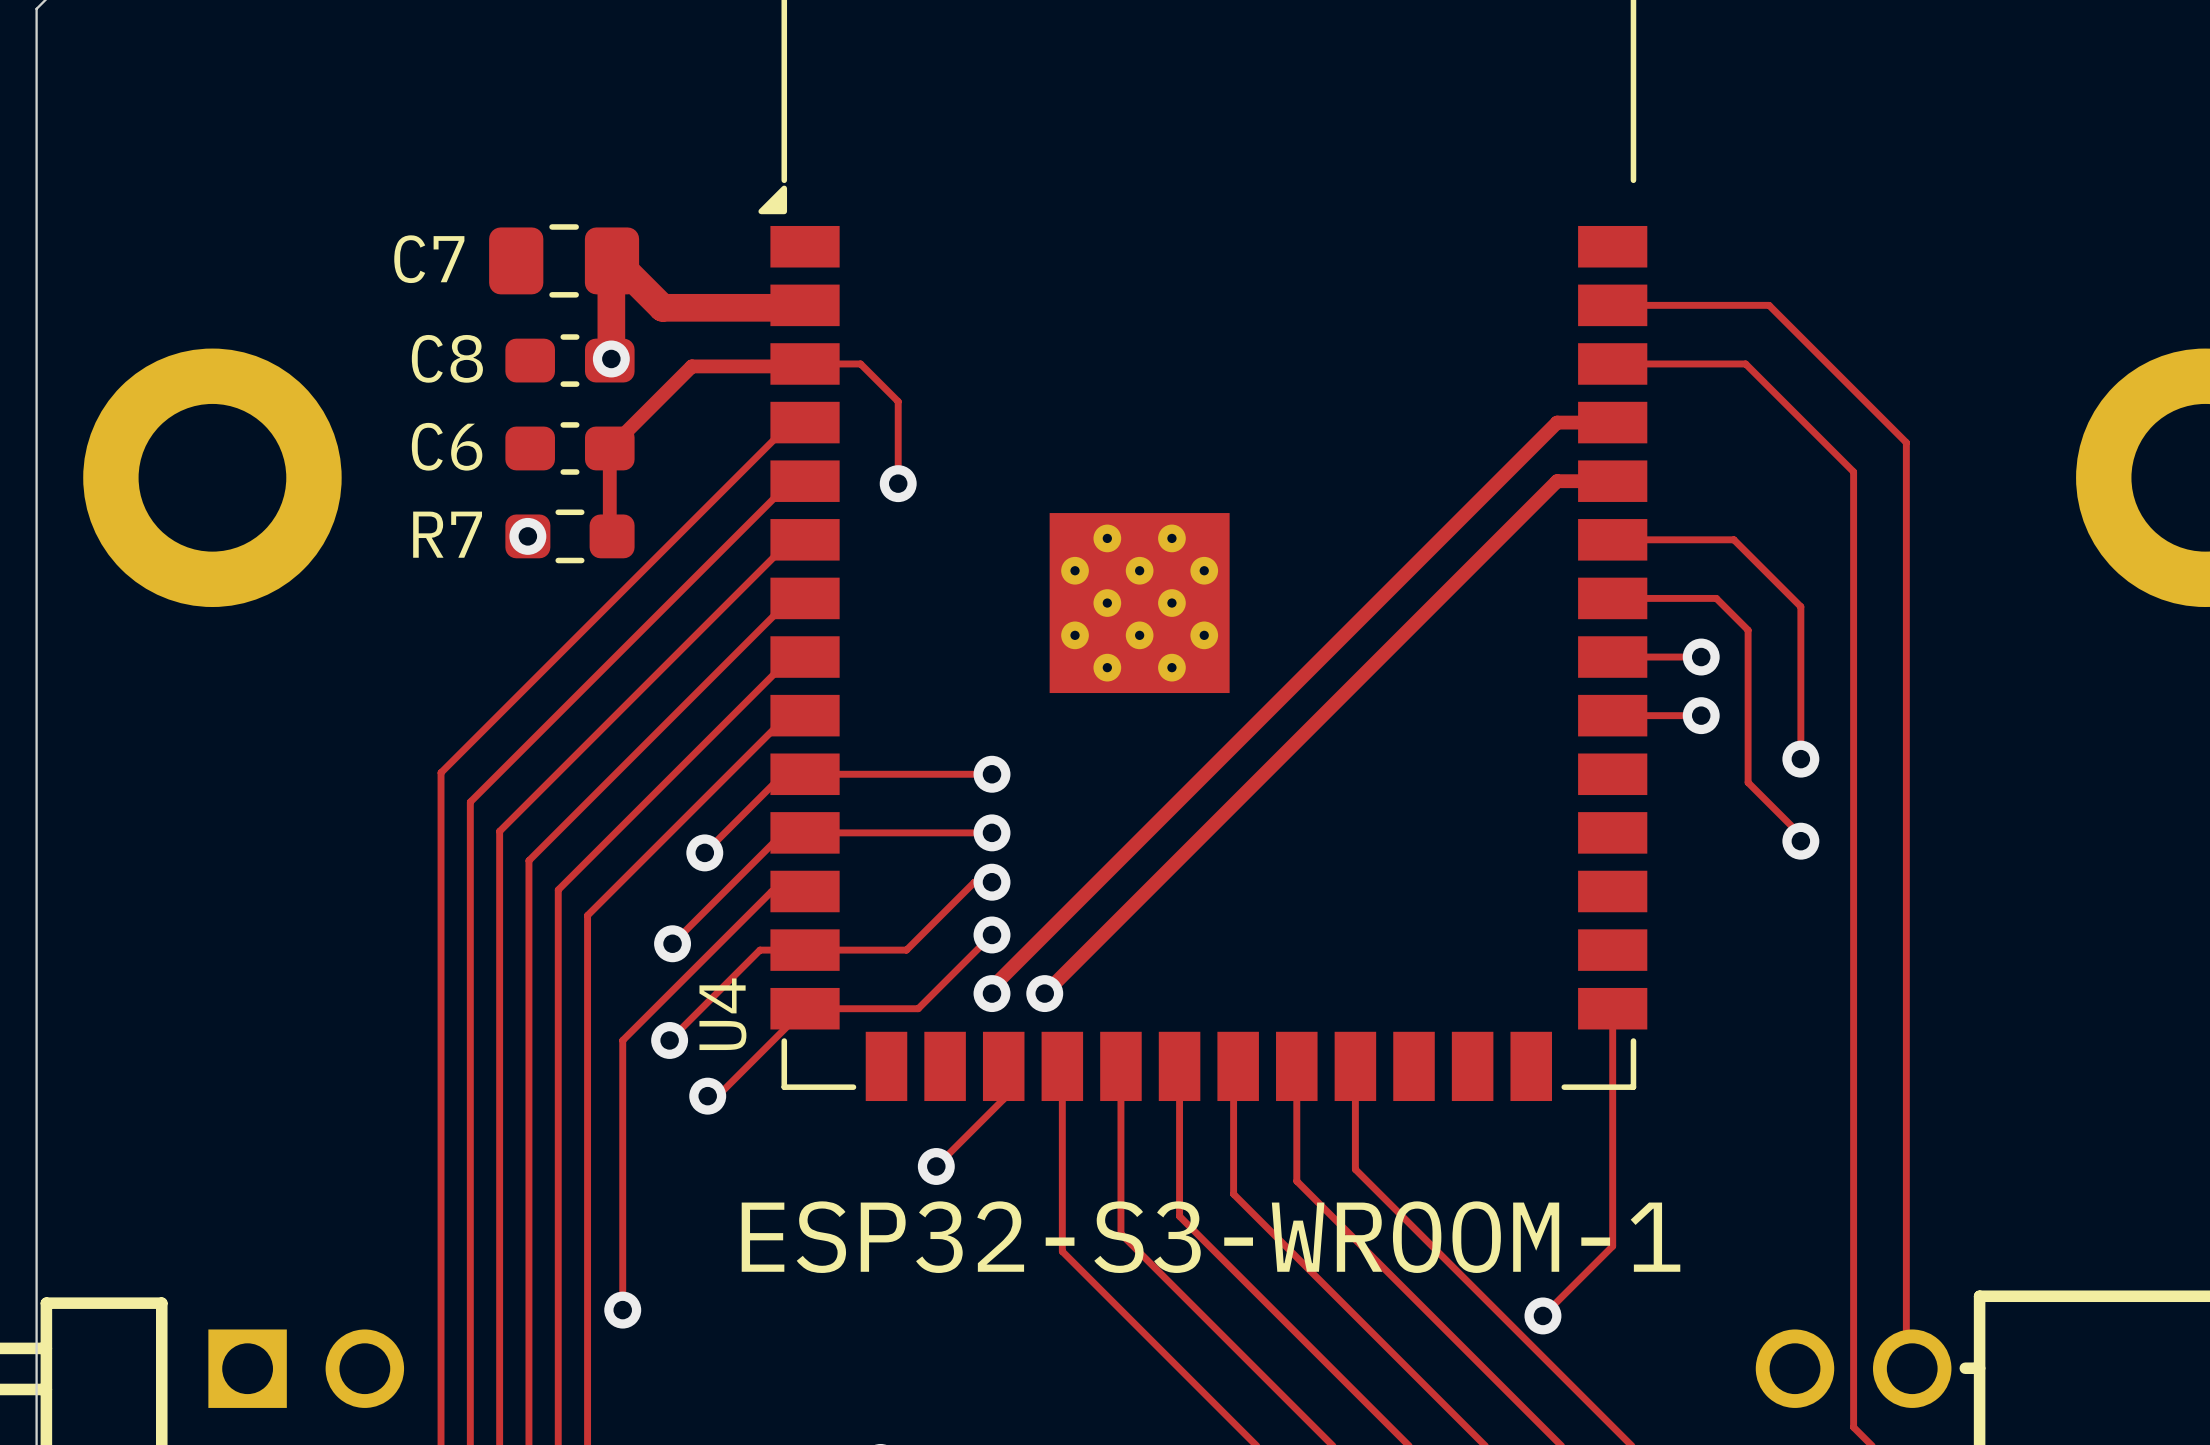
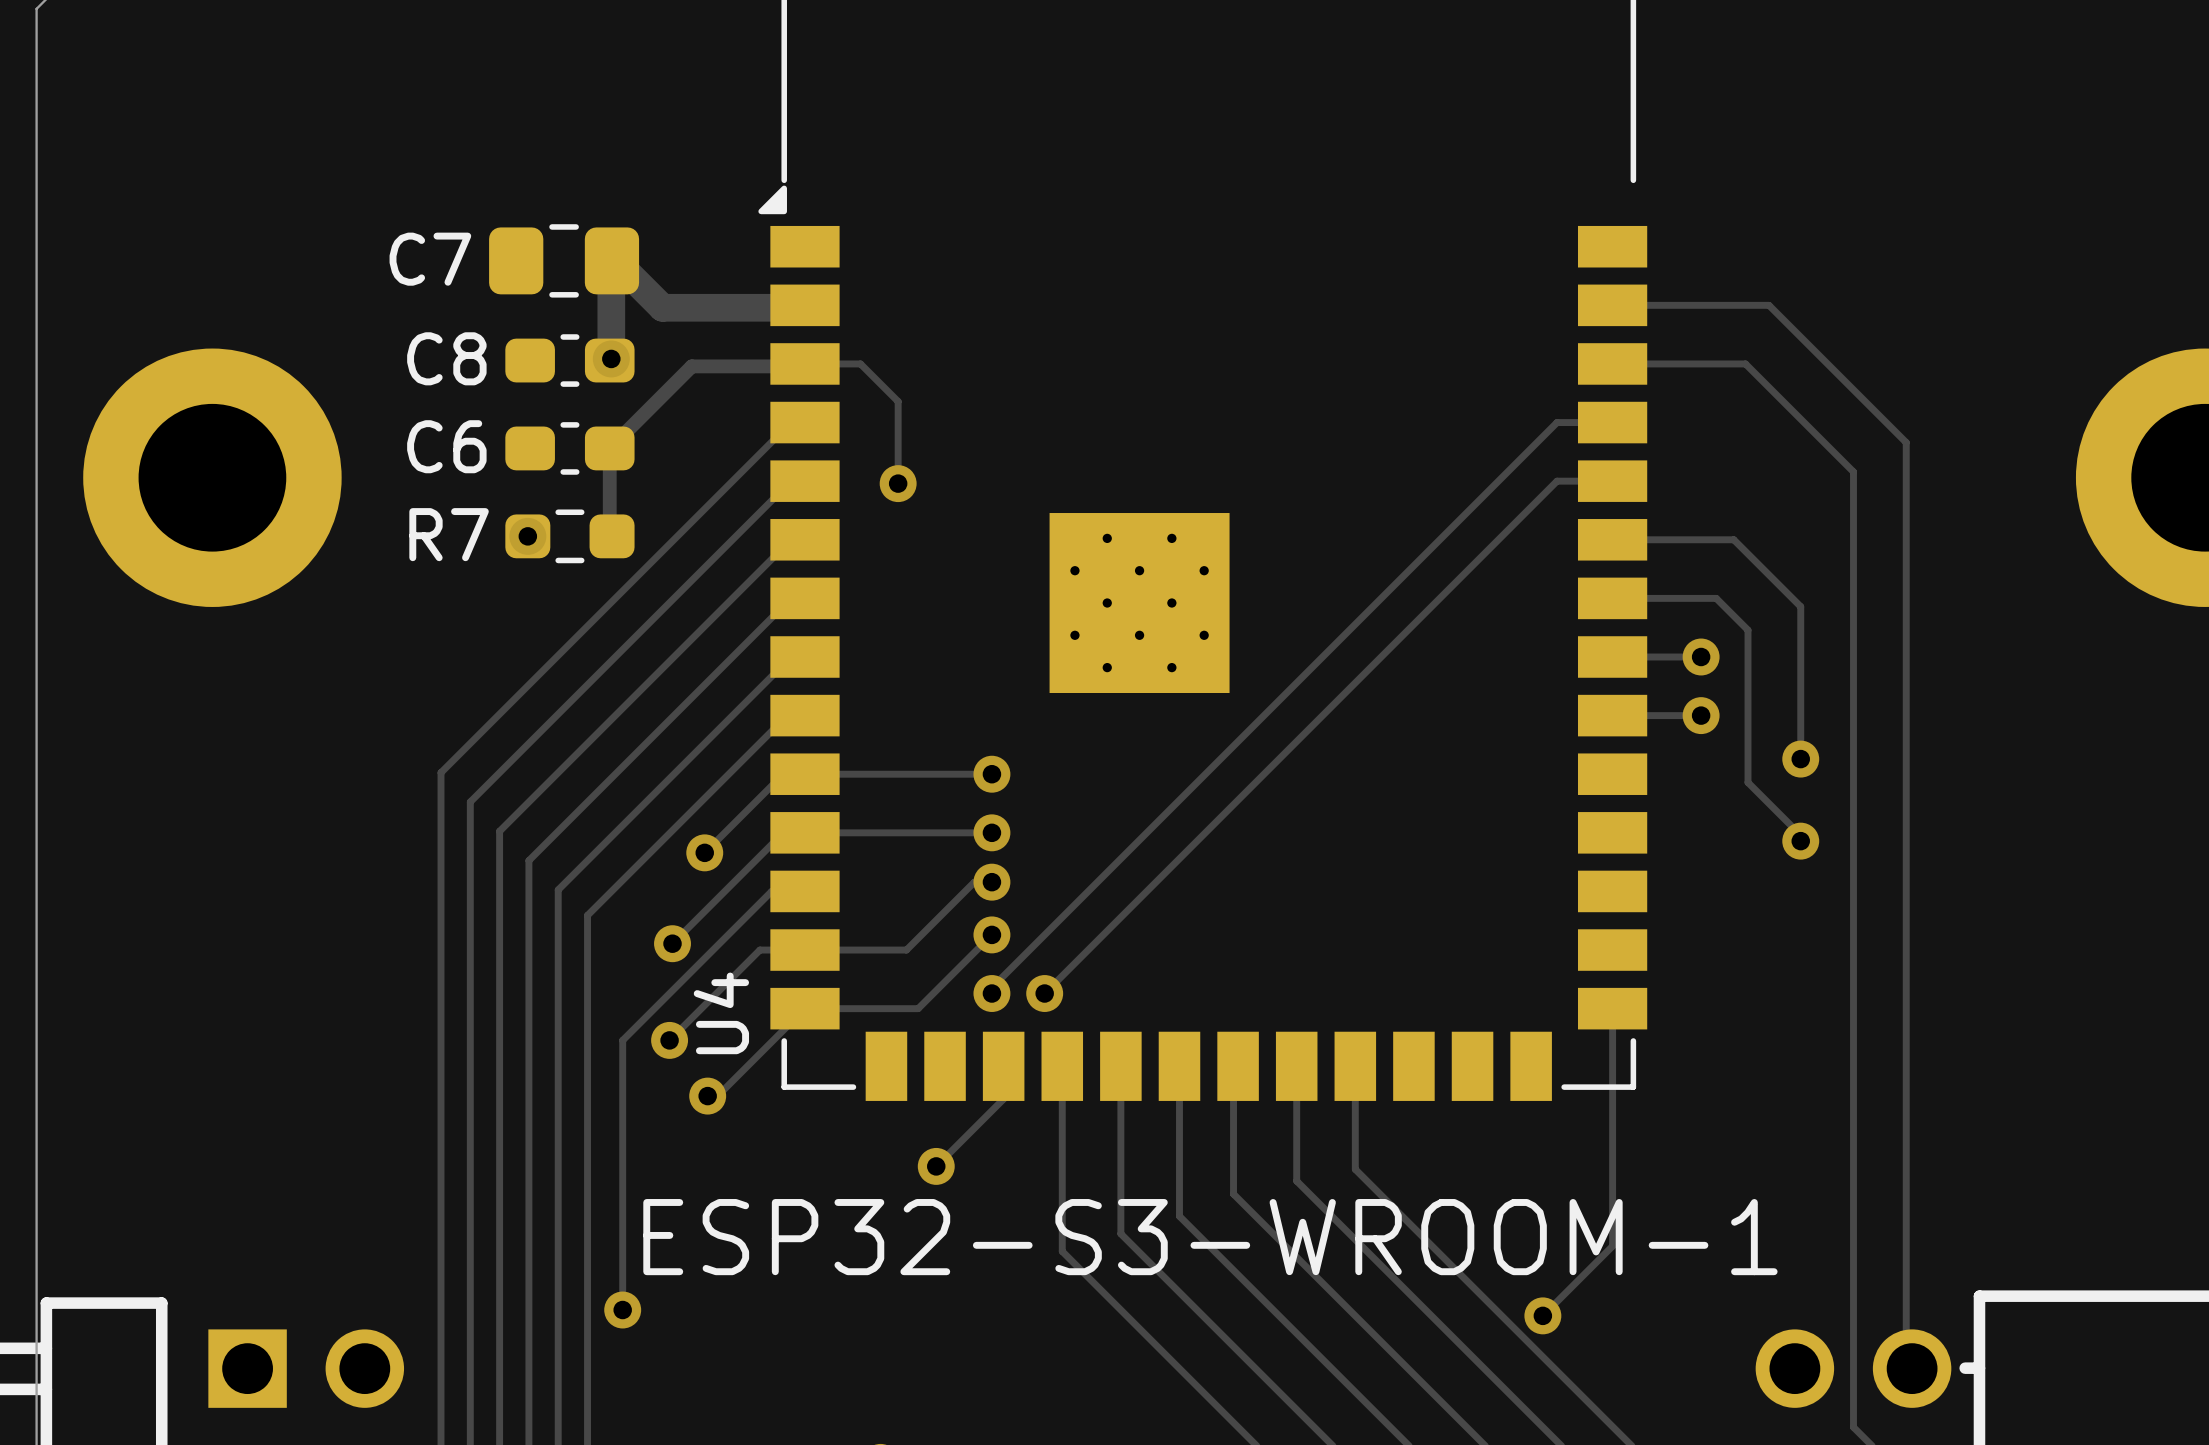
track width: thick (1612, 422) (1557, 422) (991, 987) -> thin (1612, 422) (1557, 422) (991, 987)
track width: thick (1612, 481) (1557, 481) (1044, 993) -> thin (1612, 481) (1557, 481) (1044, 993)

